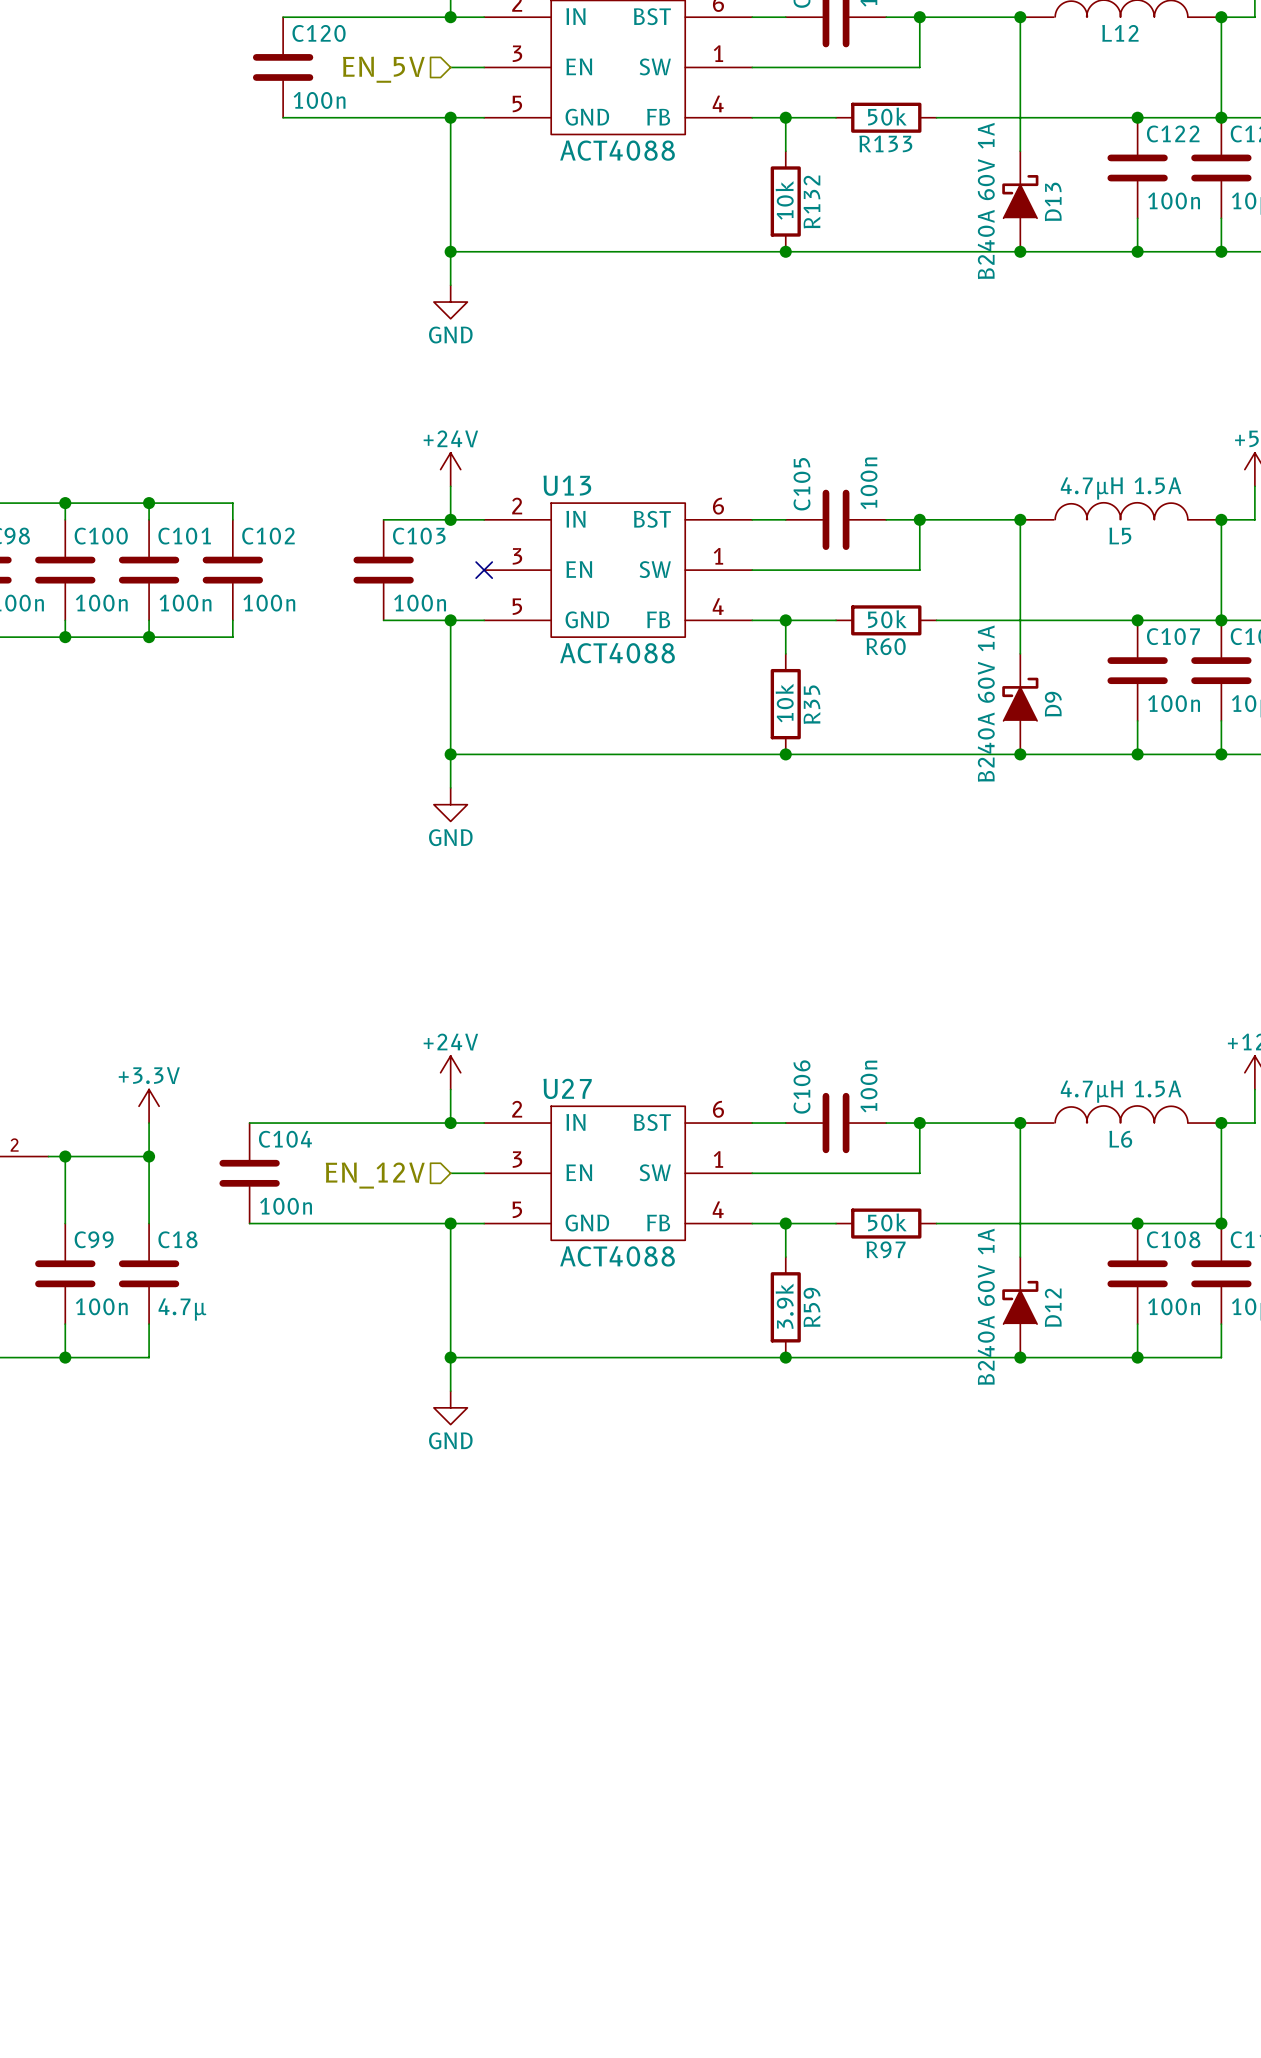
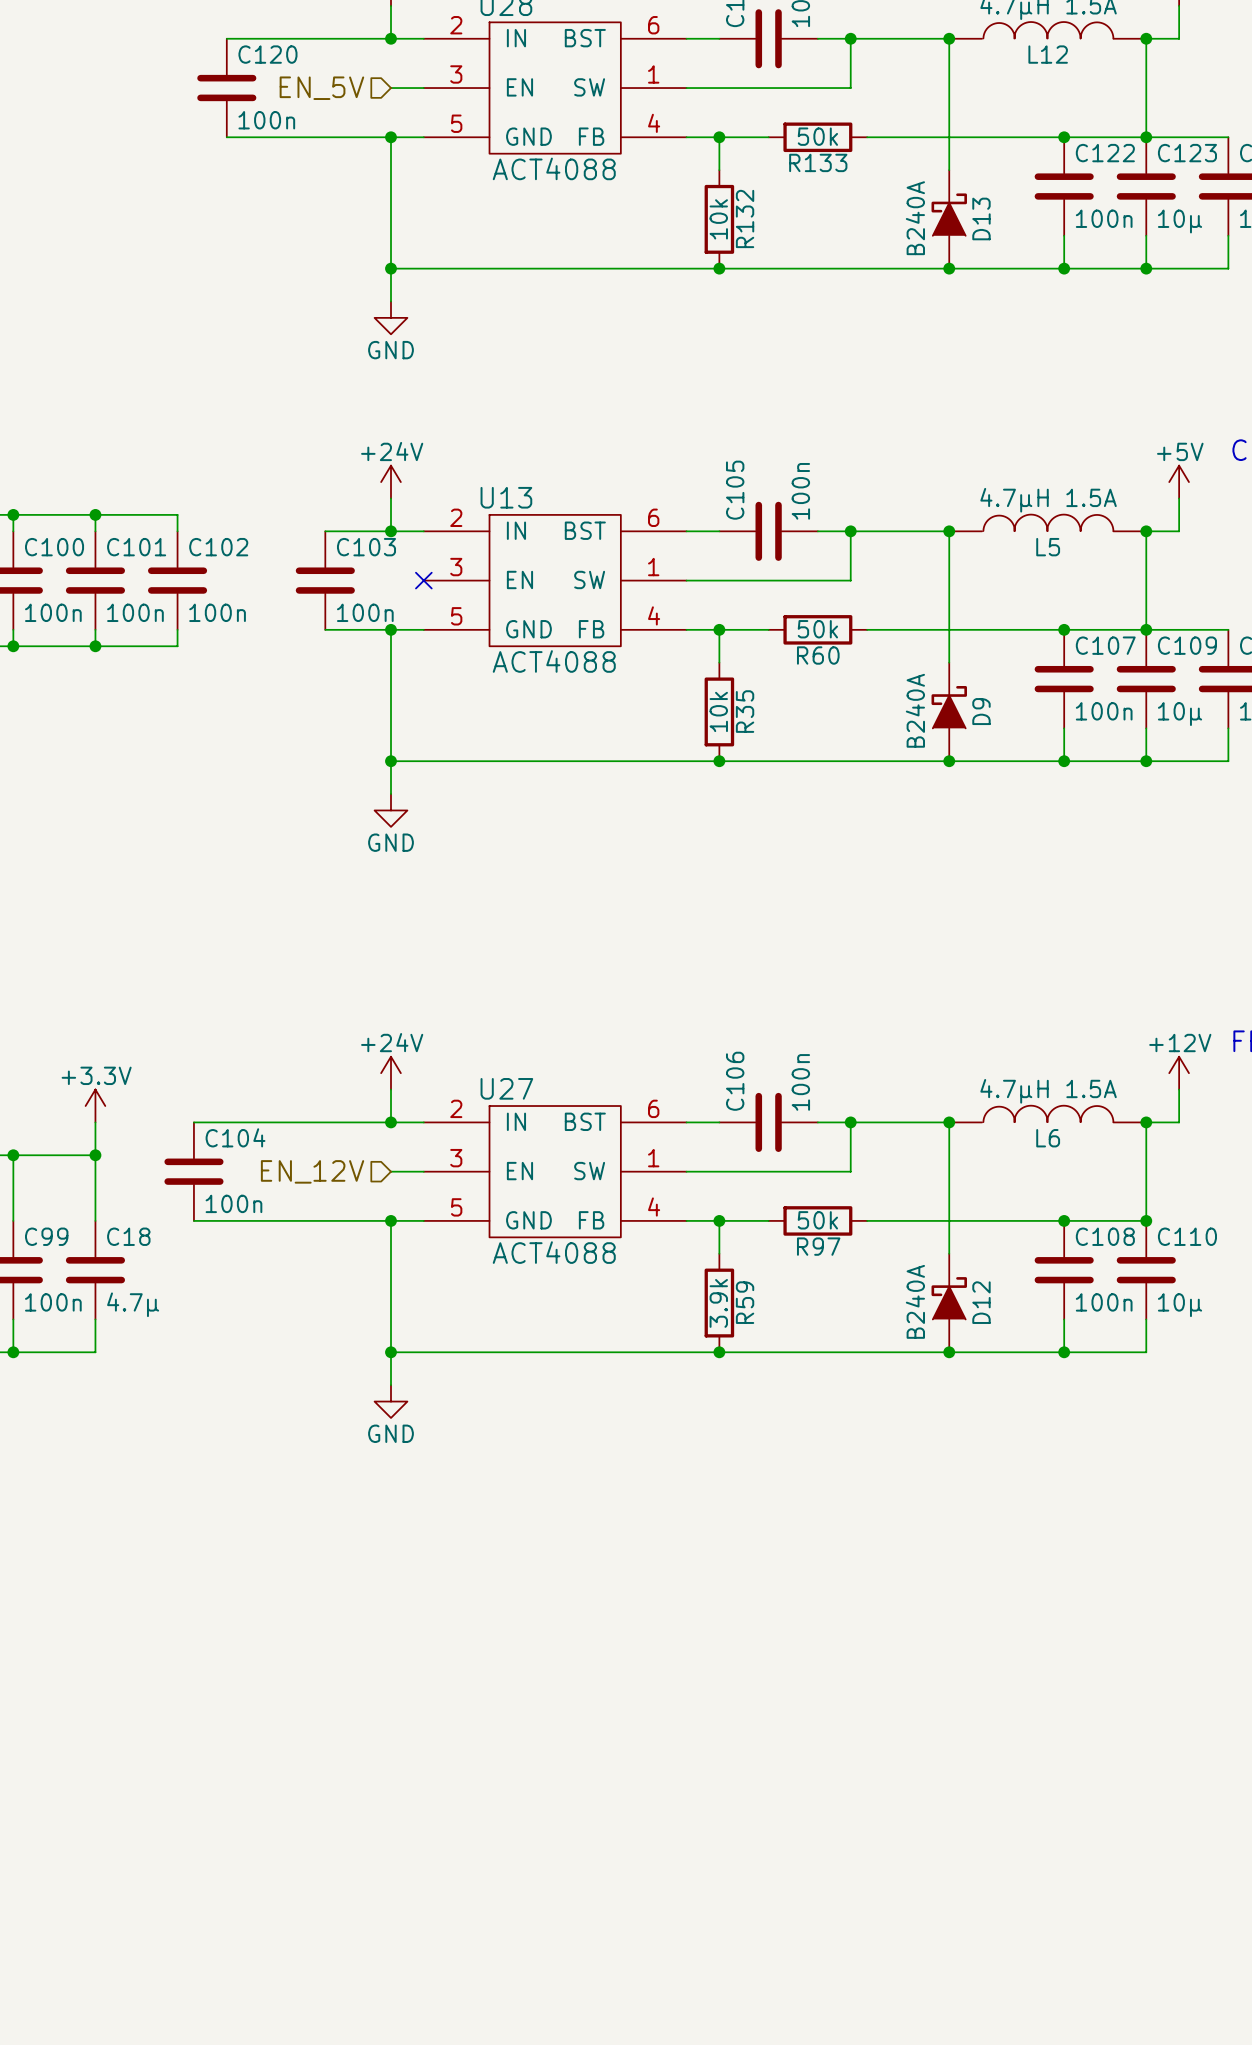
D13 value: B240A 60V 1A (986, 200) -> B240A (915, 218)
D9 value: B240A 60V 1A (986, 703) -> B240A (915, 710)
D12 value: B240A 60V 1A (986, 1306) -> B240A (915, 1301)

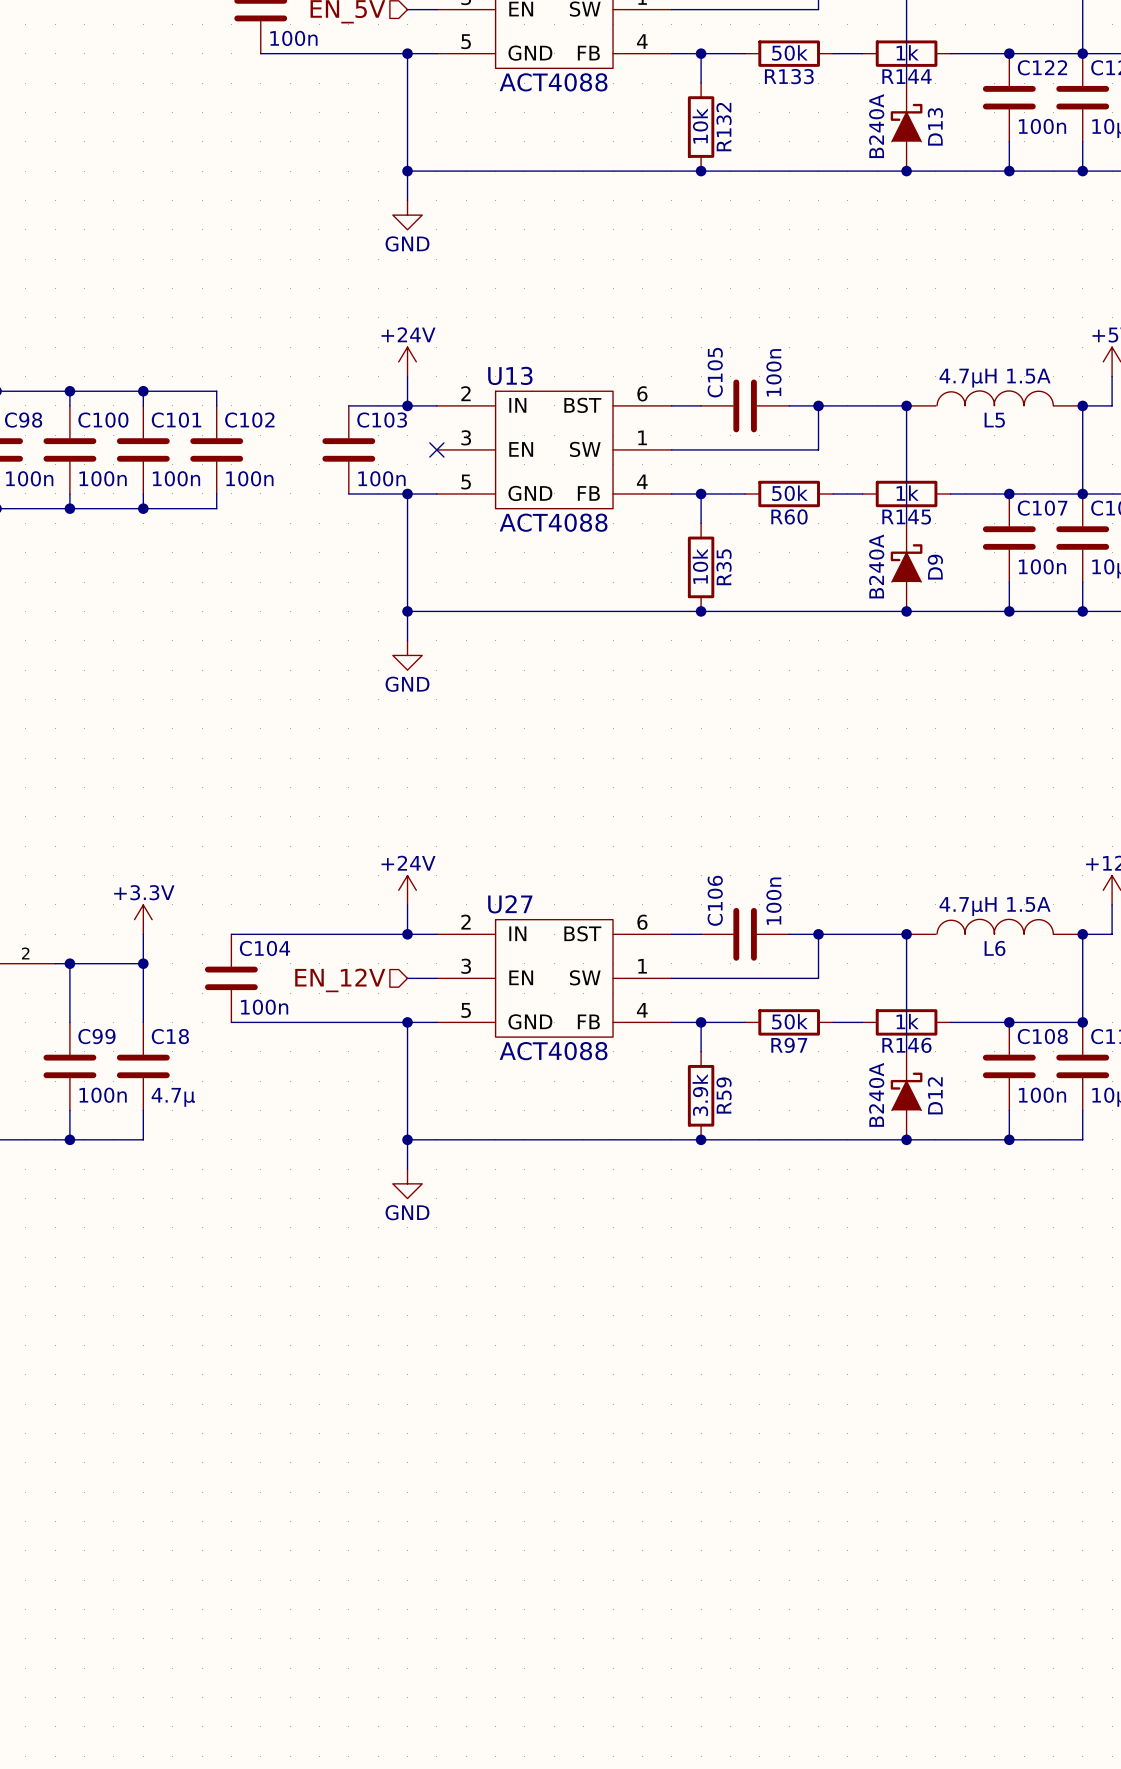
wire: (899, 137) (998, 137) -> none
R144: none -> 1k (906, 53)
wire: (899, 629) (998, 629) -> none
R145: none -> 1k (906, 493)
wire: (899, 1220) (998, 1220) -> none
R146: none -> 1k (906, 1022)

